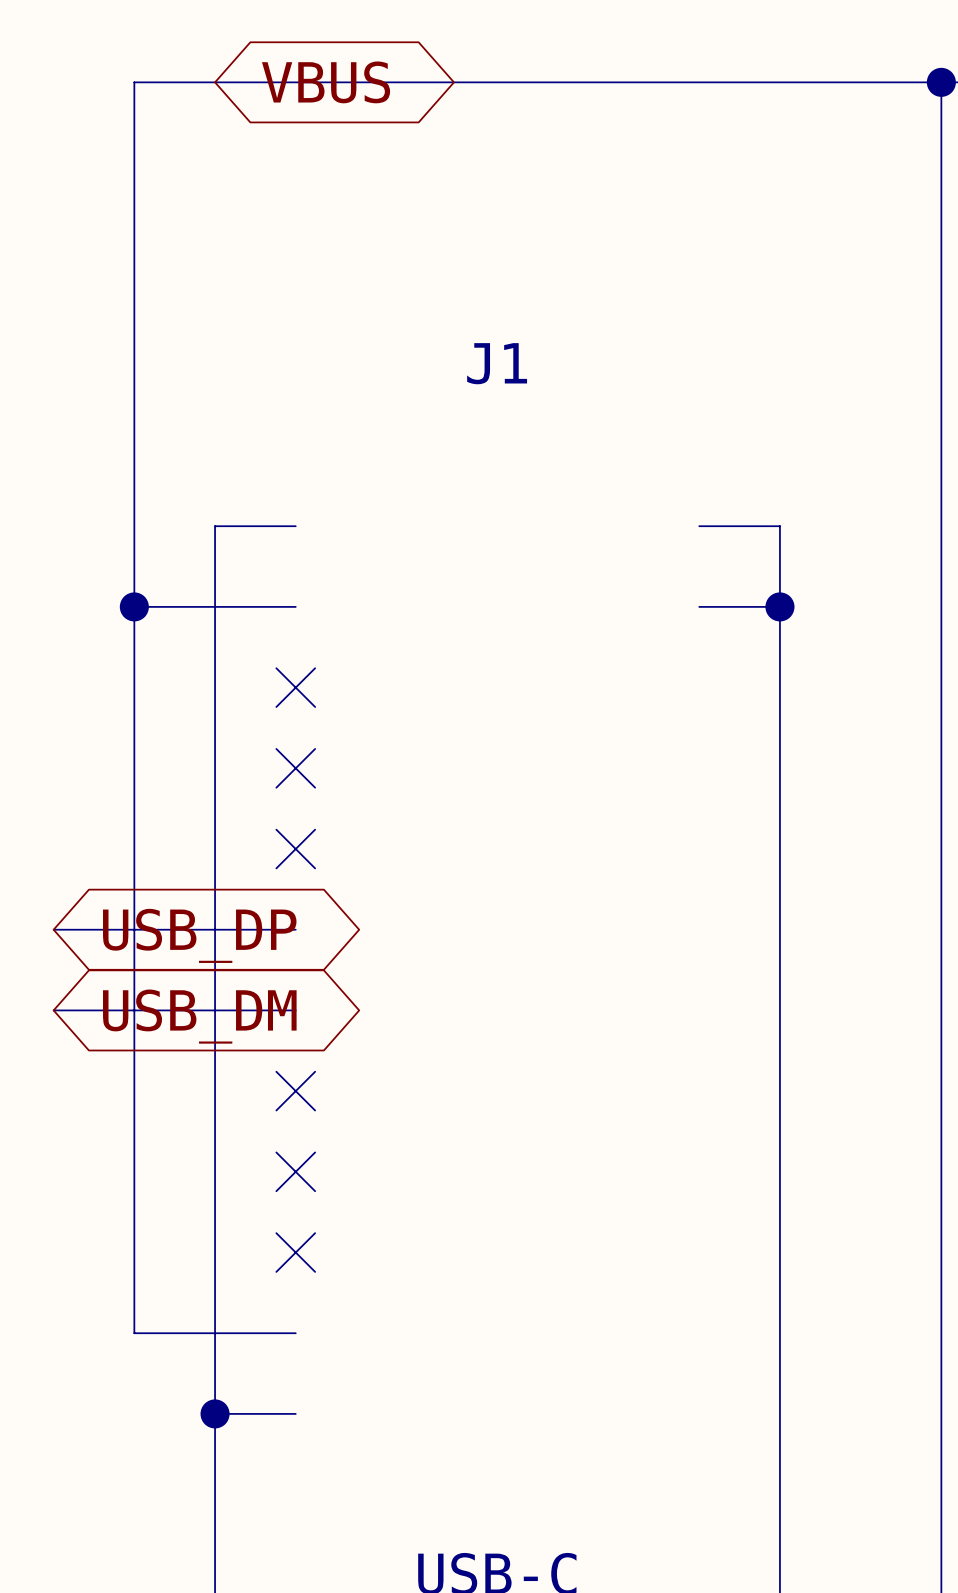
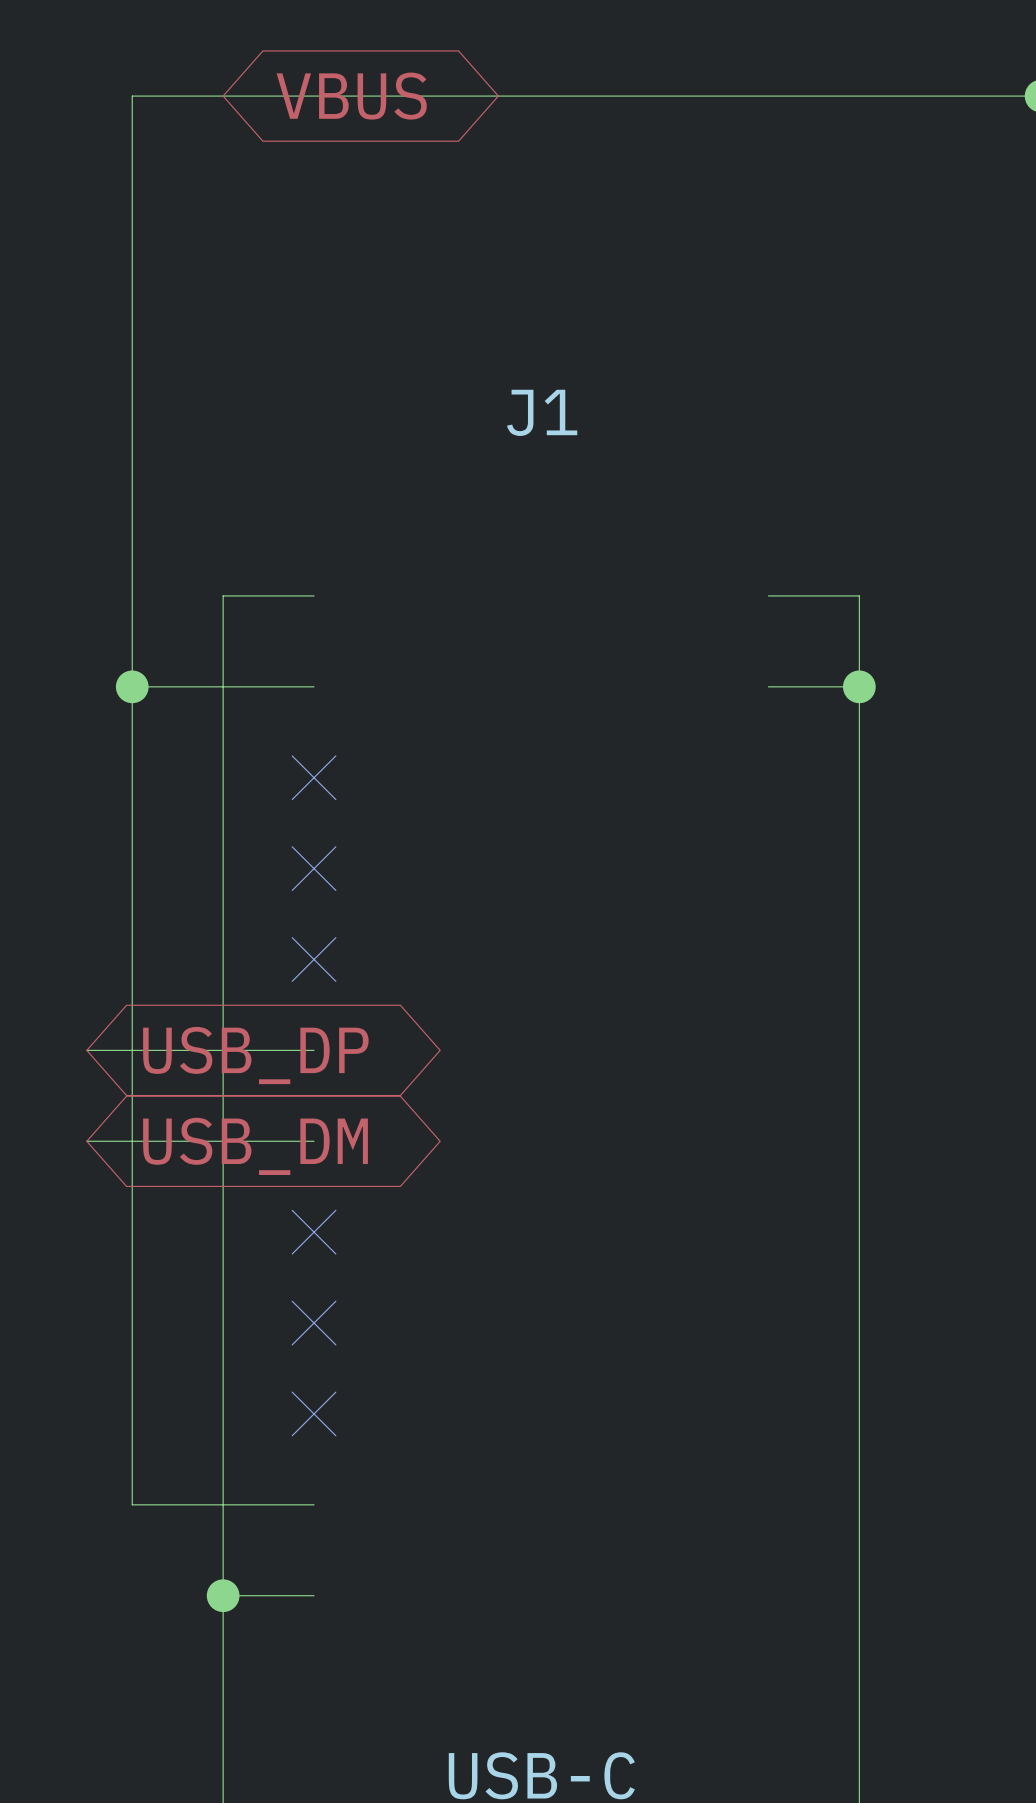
wire: (53, 929) (94, 929) -> none
global label position: USB_DP (199, 935) -> USB_DP (255, 1055)
wire: (53, 1010) (94, 1010) -> none
global label position: USB_DM (199, 1016) -> USB_DM (255, 1146)

